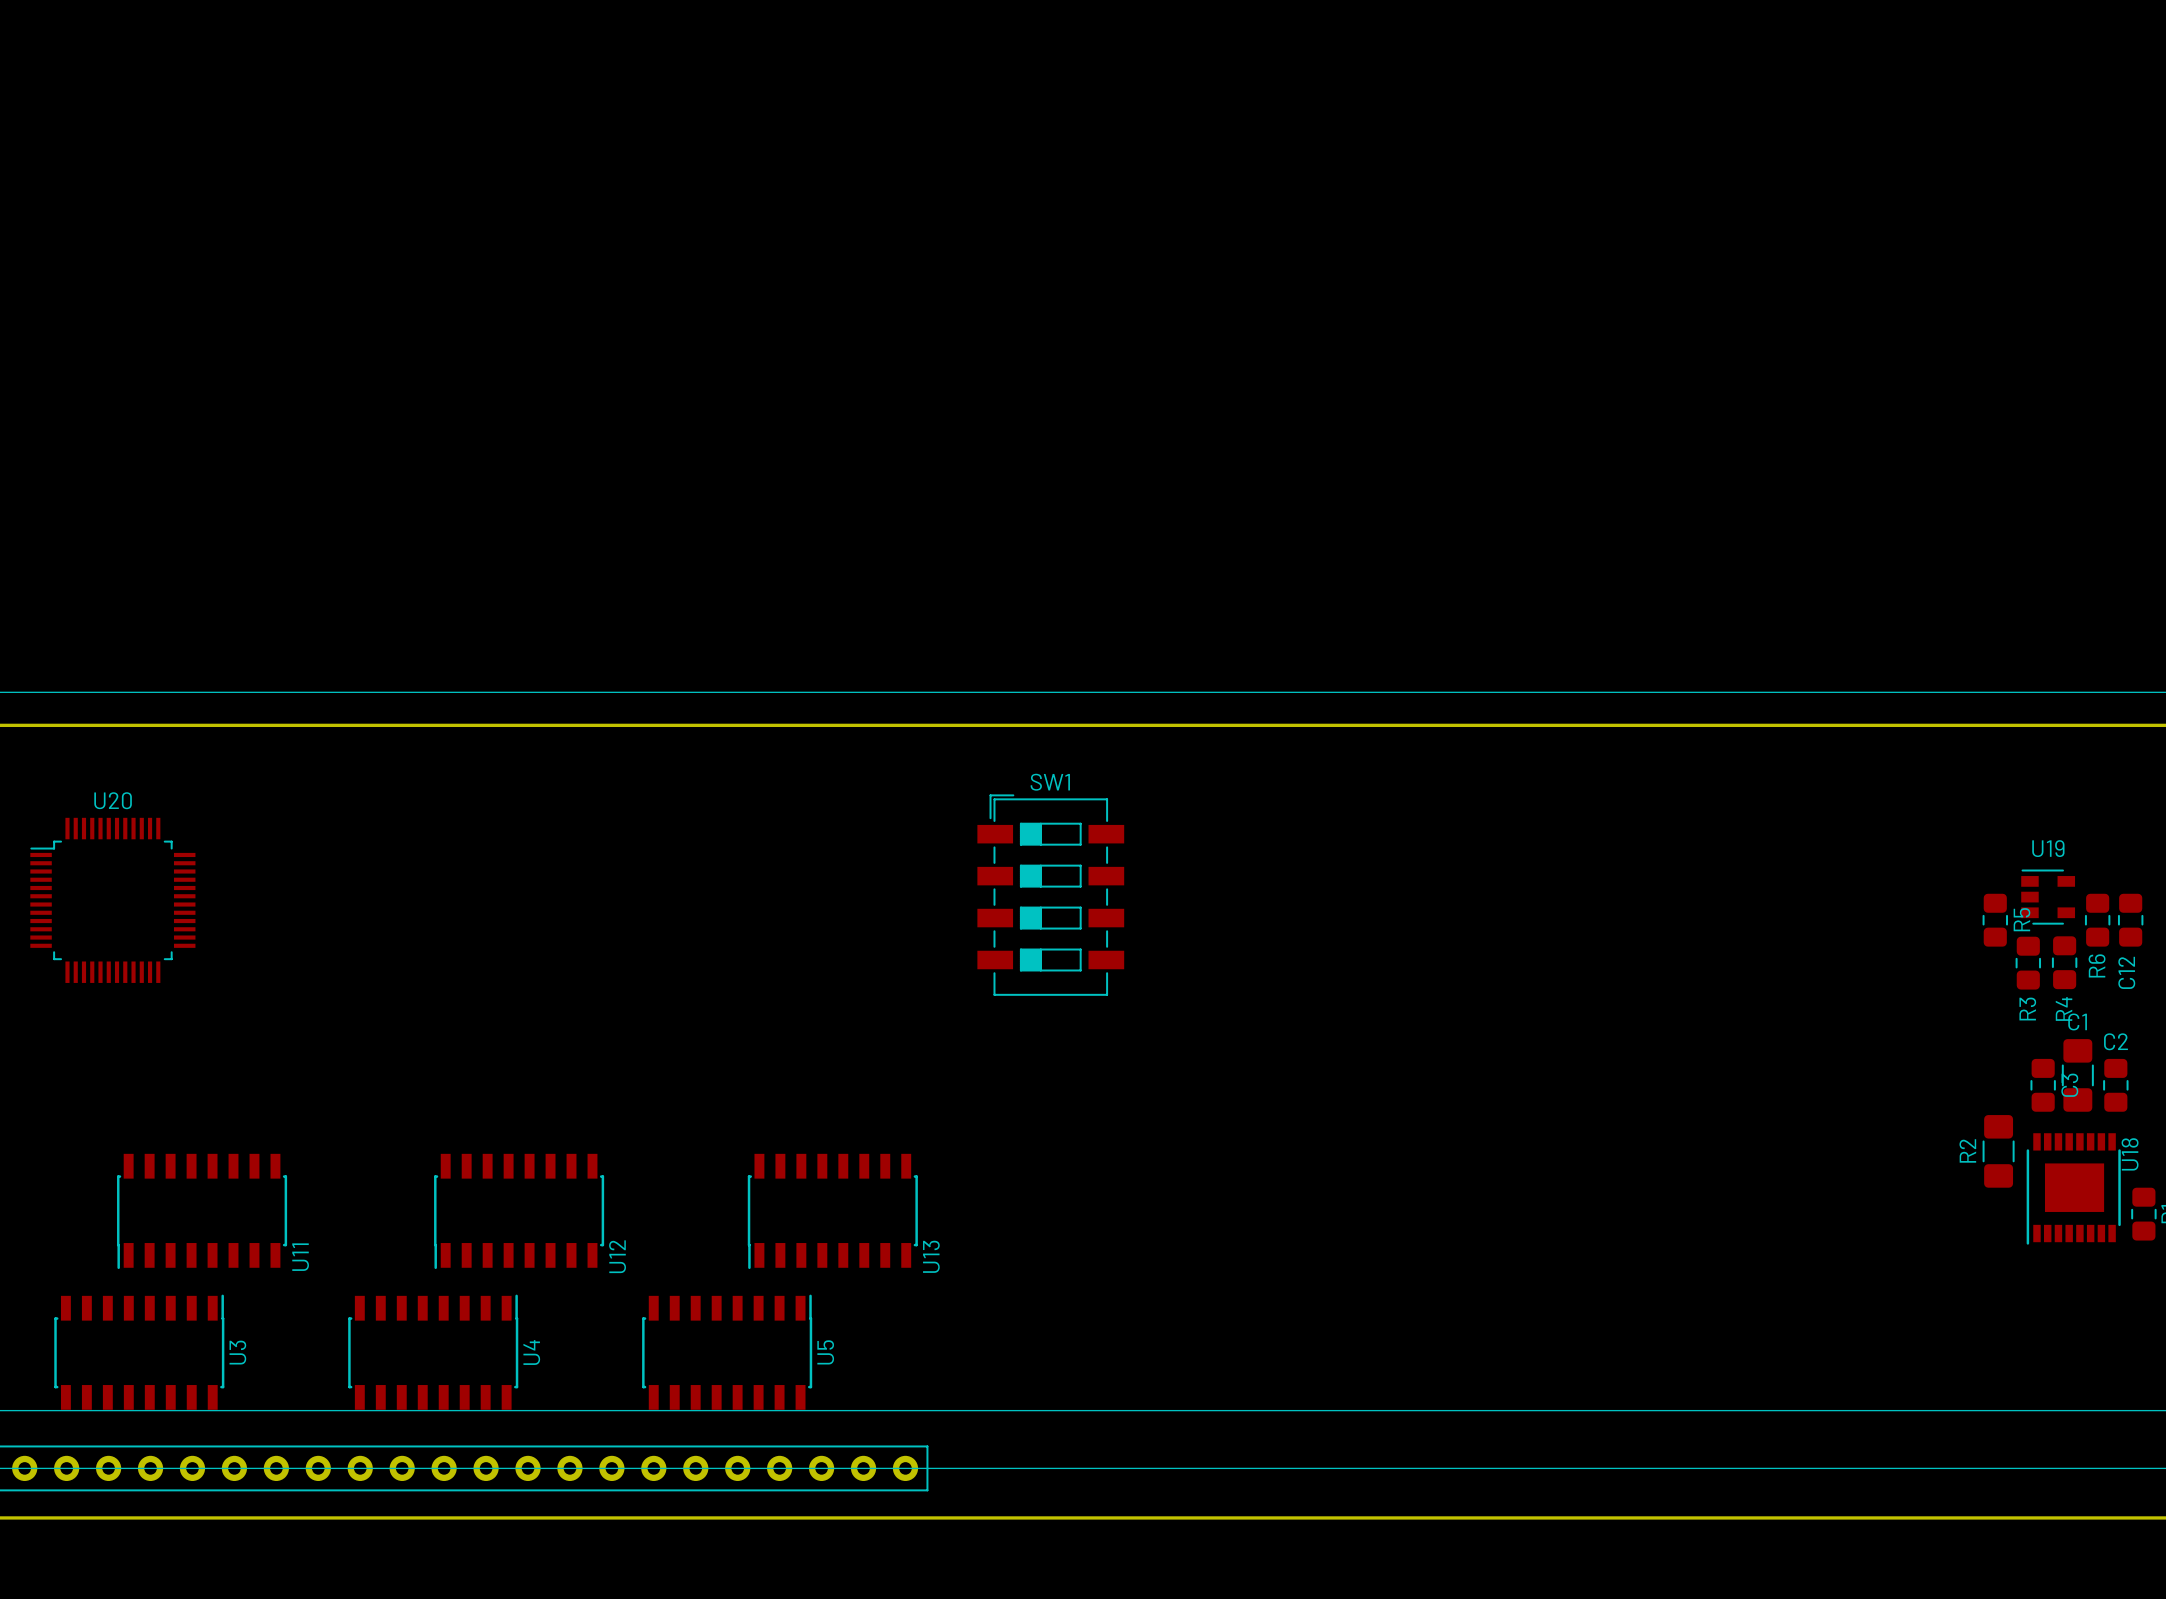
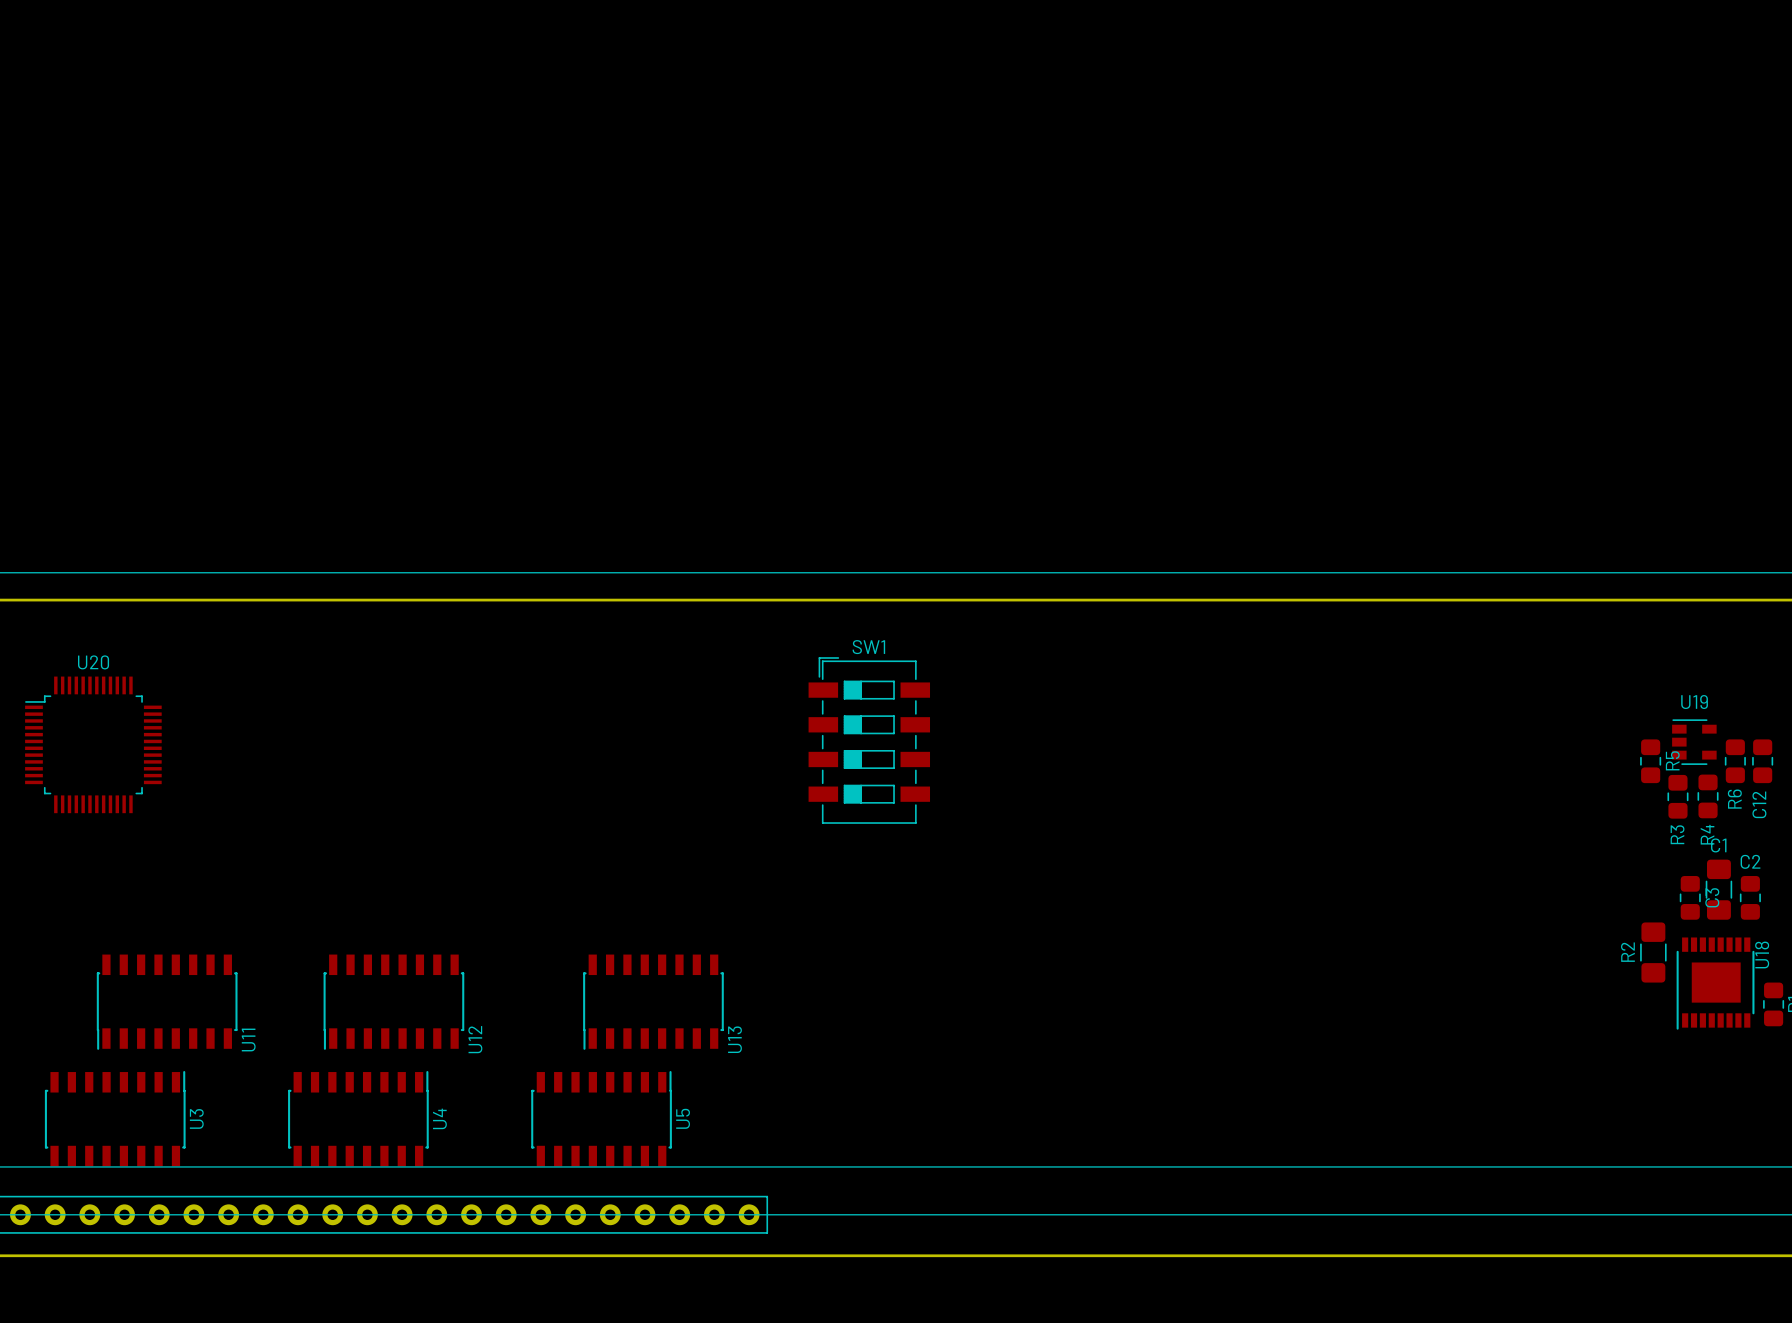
U12 position: (519, 1211) -> (393, 1002)
U13 position: (832, 1211) -> (653, 1002)

